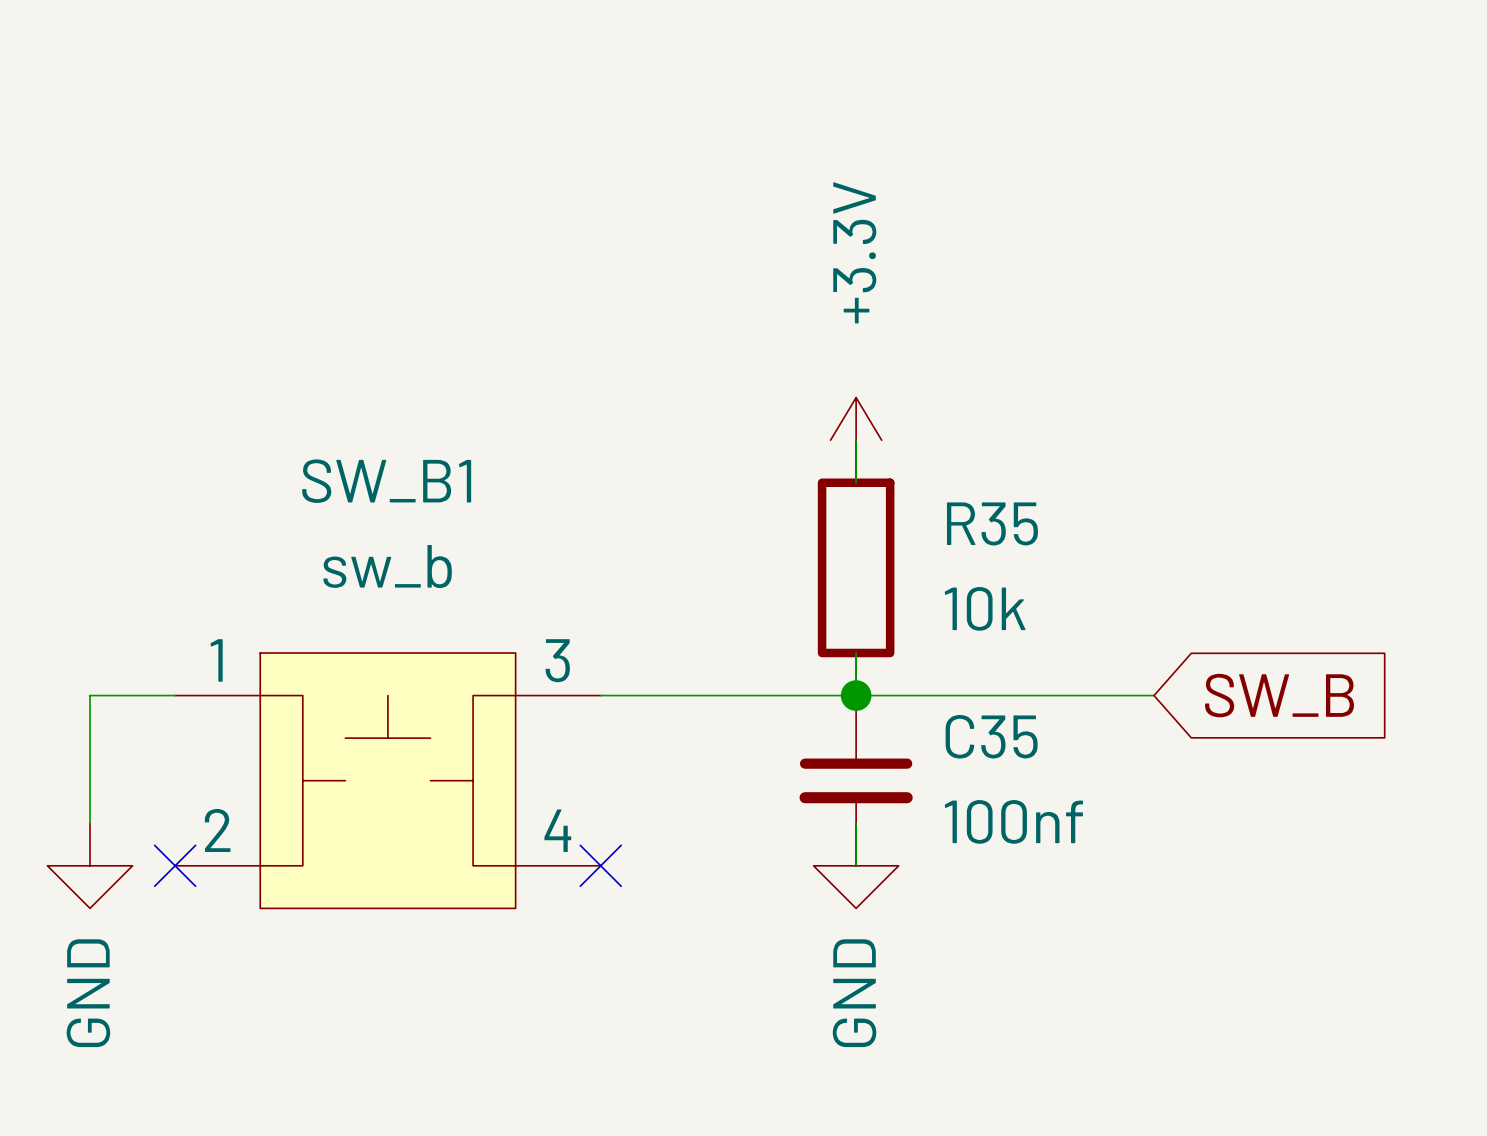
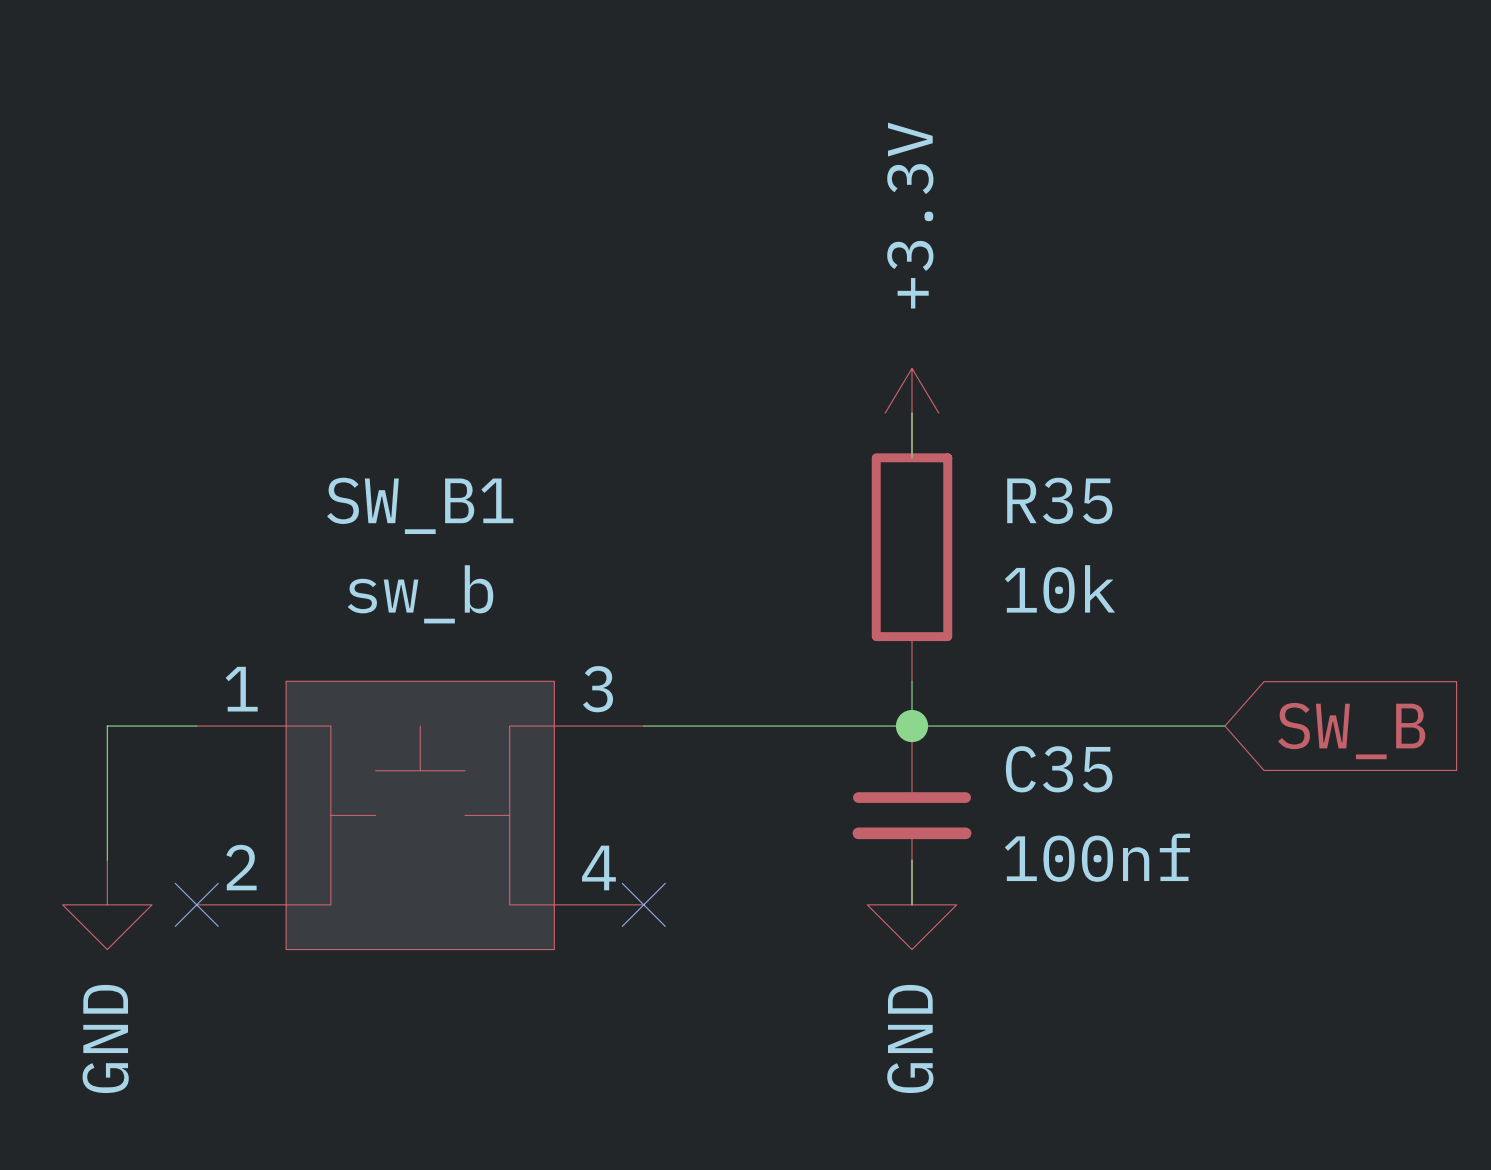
power symbol position: +3.3V (856, 440) -> +3.3V (912, 413)
R35 position: (856, 567) -> (912, 547)

